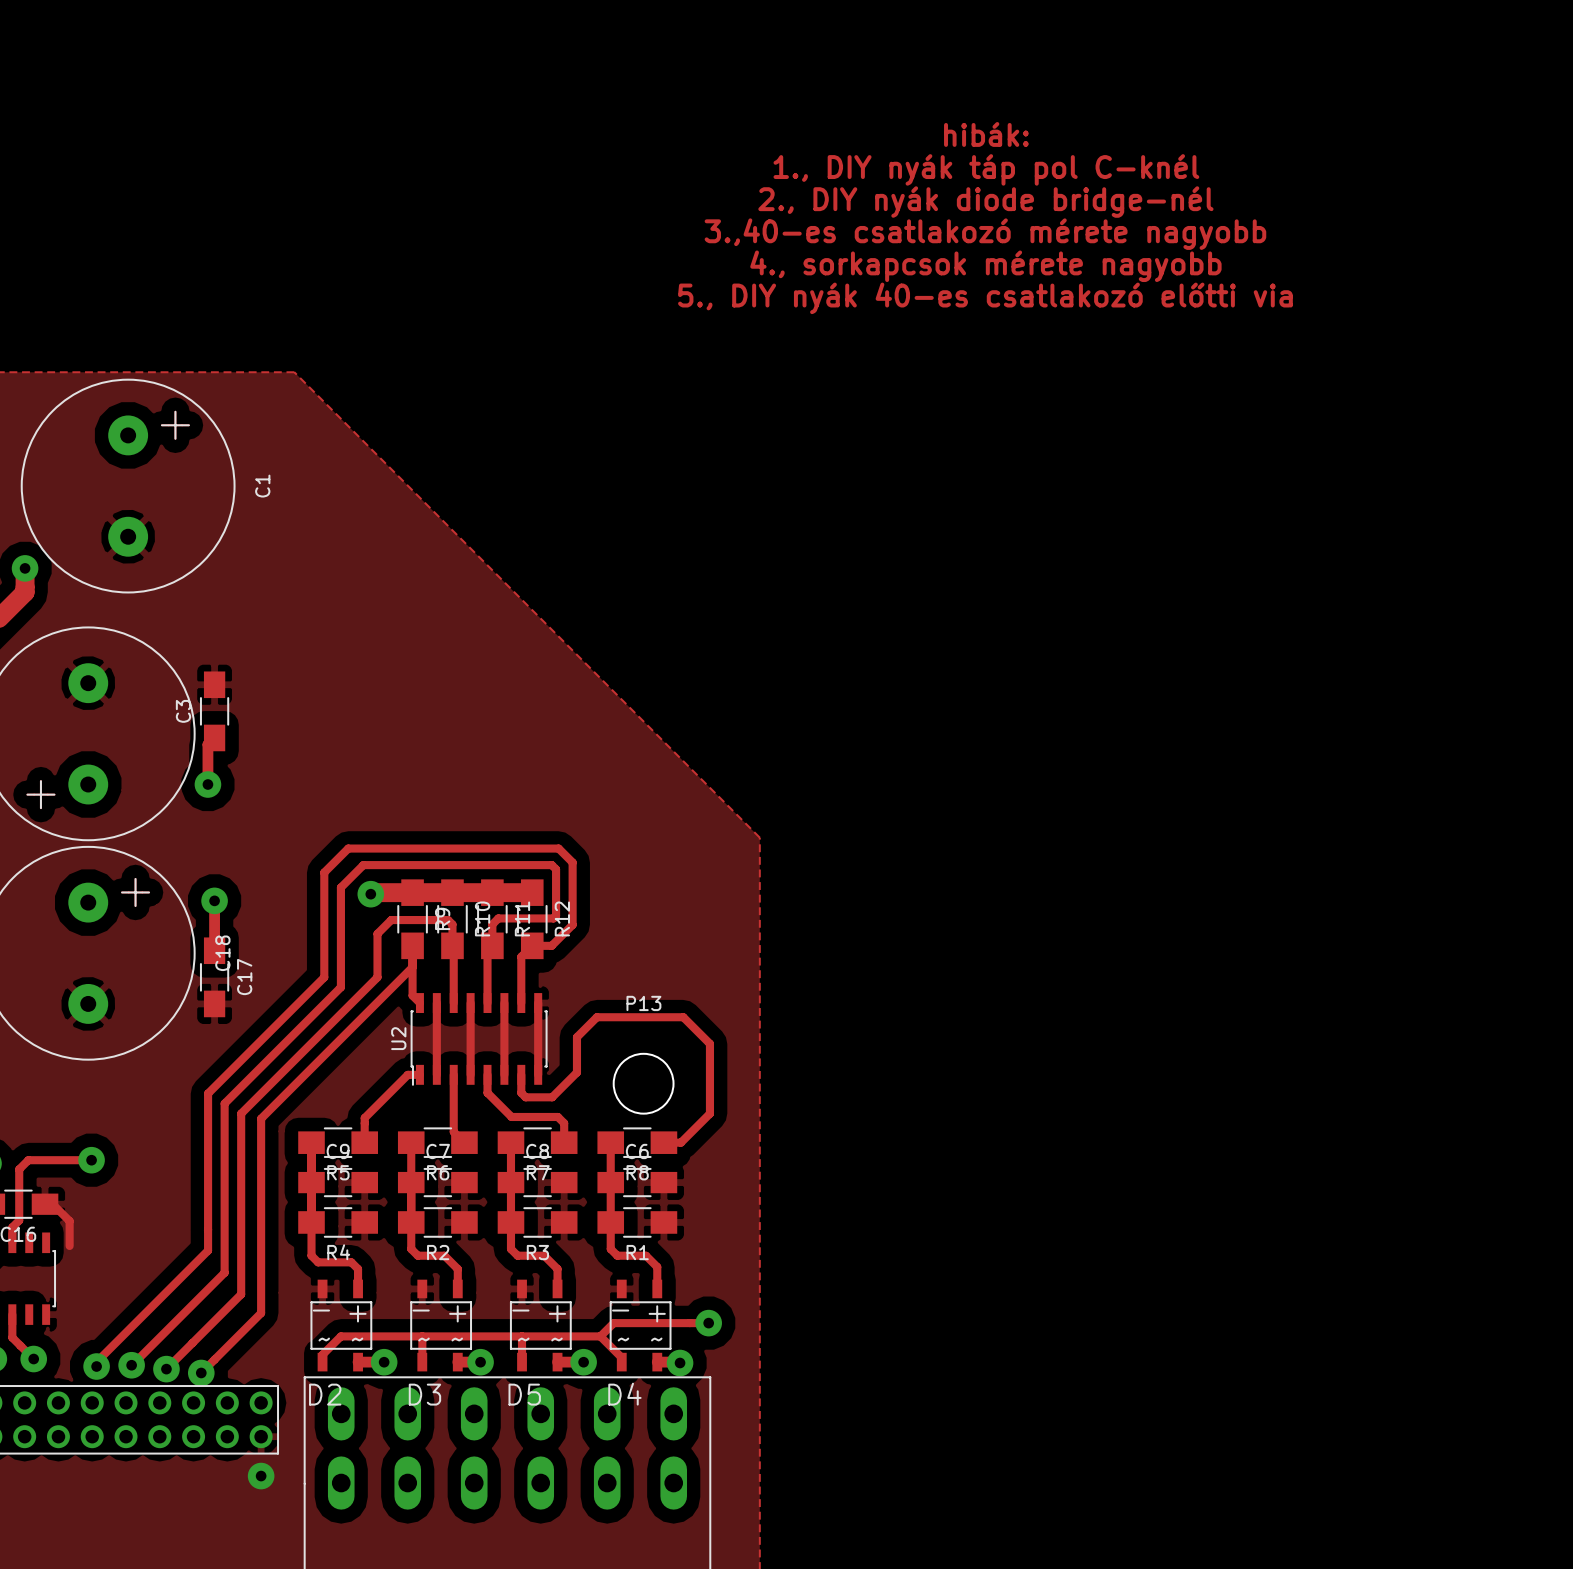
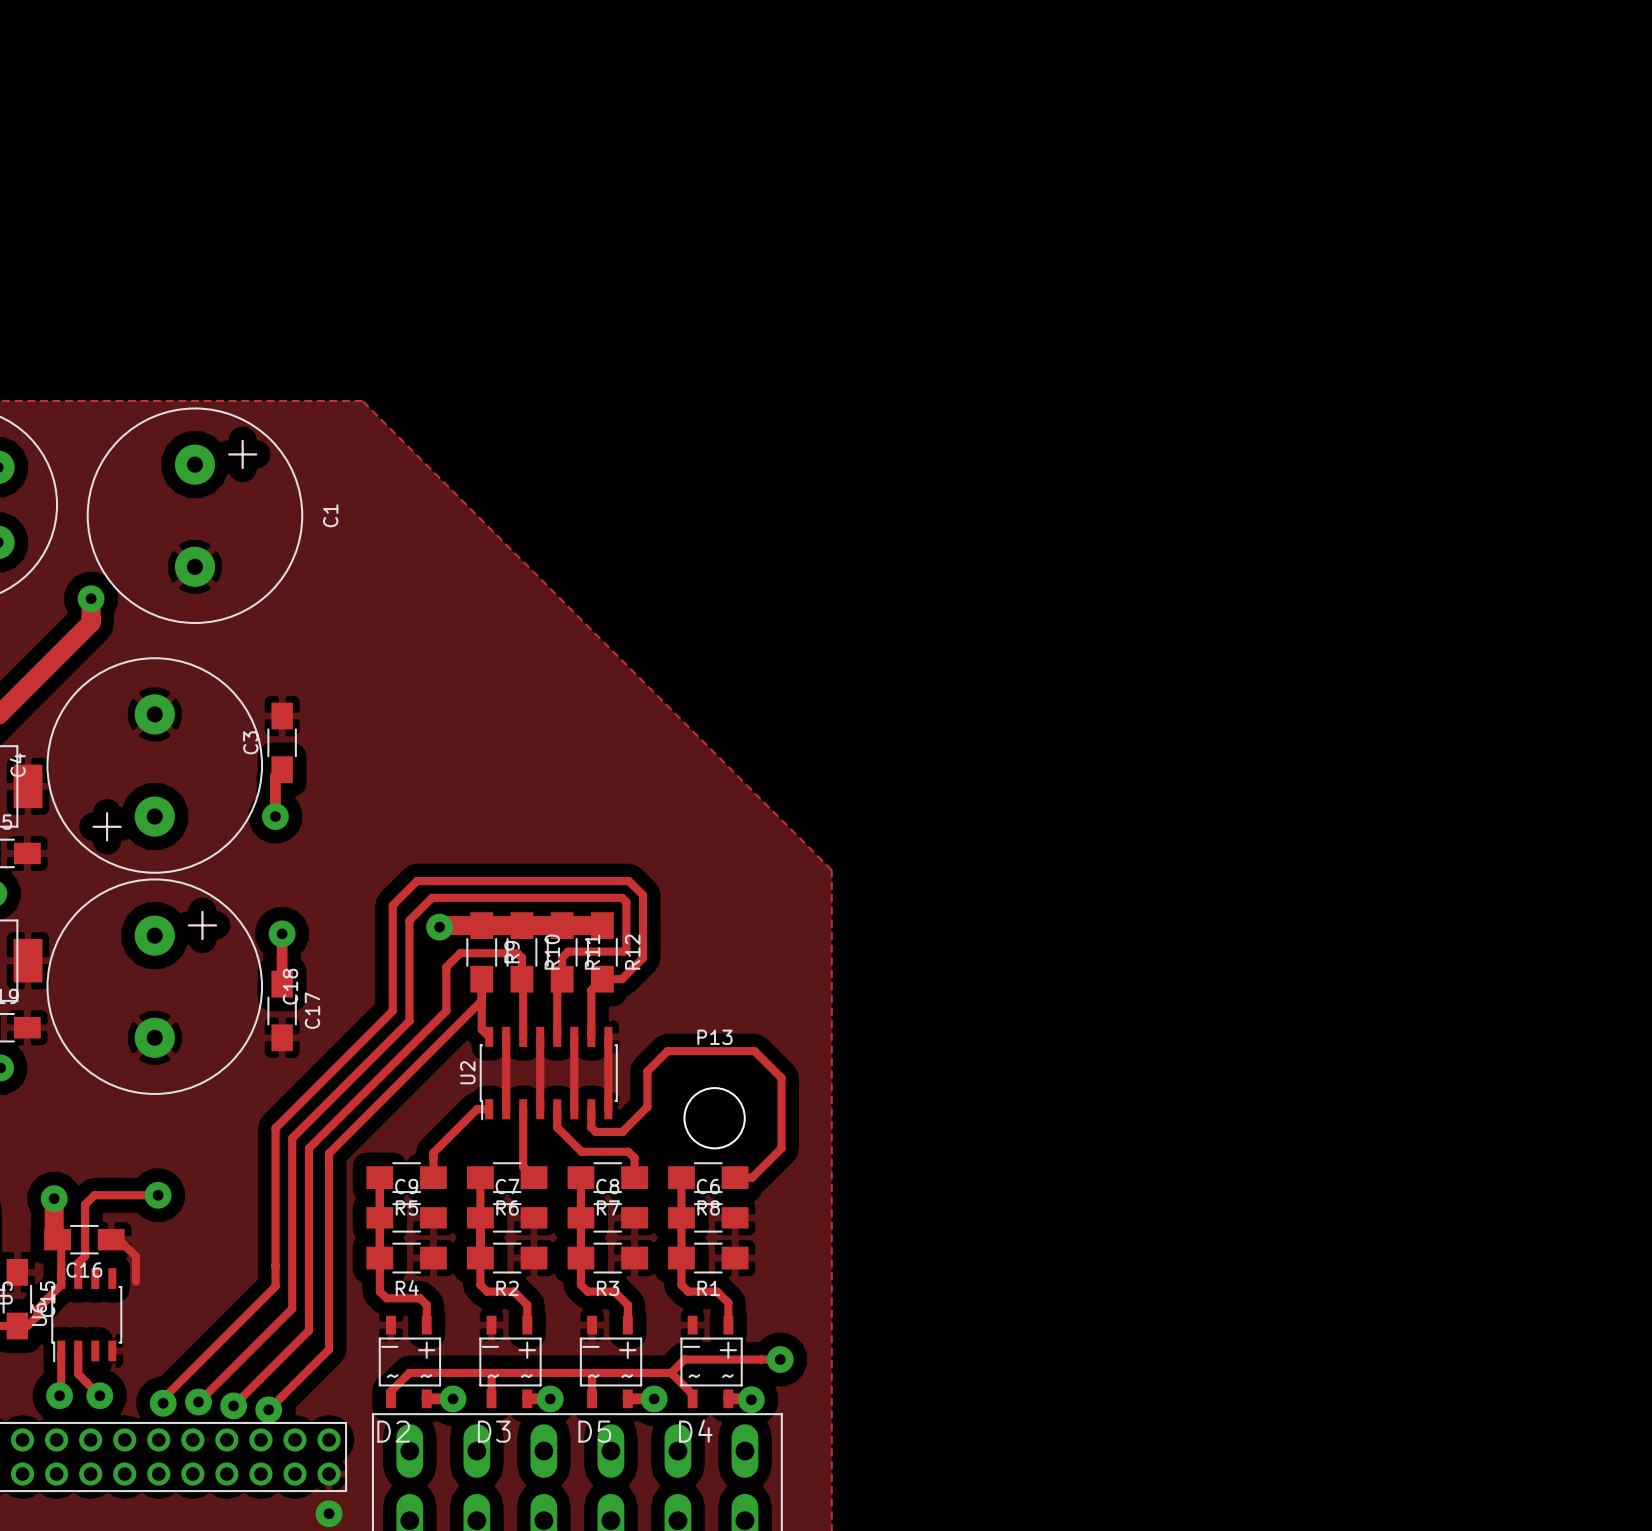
text: hibák: (986, 134) -> none
text: 1., DIY nyák táp pol C-knél (986, 169) -> none
text: 2., DIY nyák diode bridge-nél (985, 202) -> none
text: 3.,40-es csatlakozó mérete nagyobb (985, 234) -> none
text: 4., sorkapcsok mérete nagyobb (985, 266) -> none
text: 5., DIY nyák 40-es csatlakozó előtti via (985, 298) -> none

